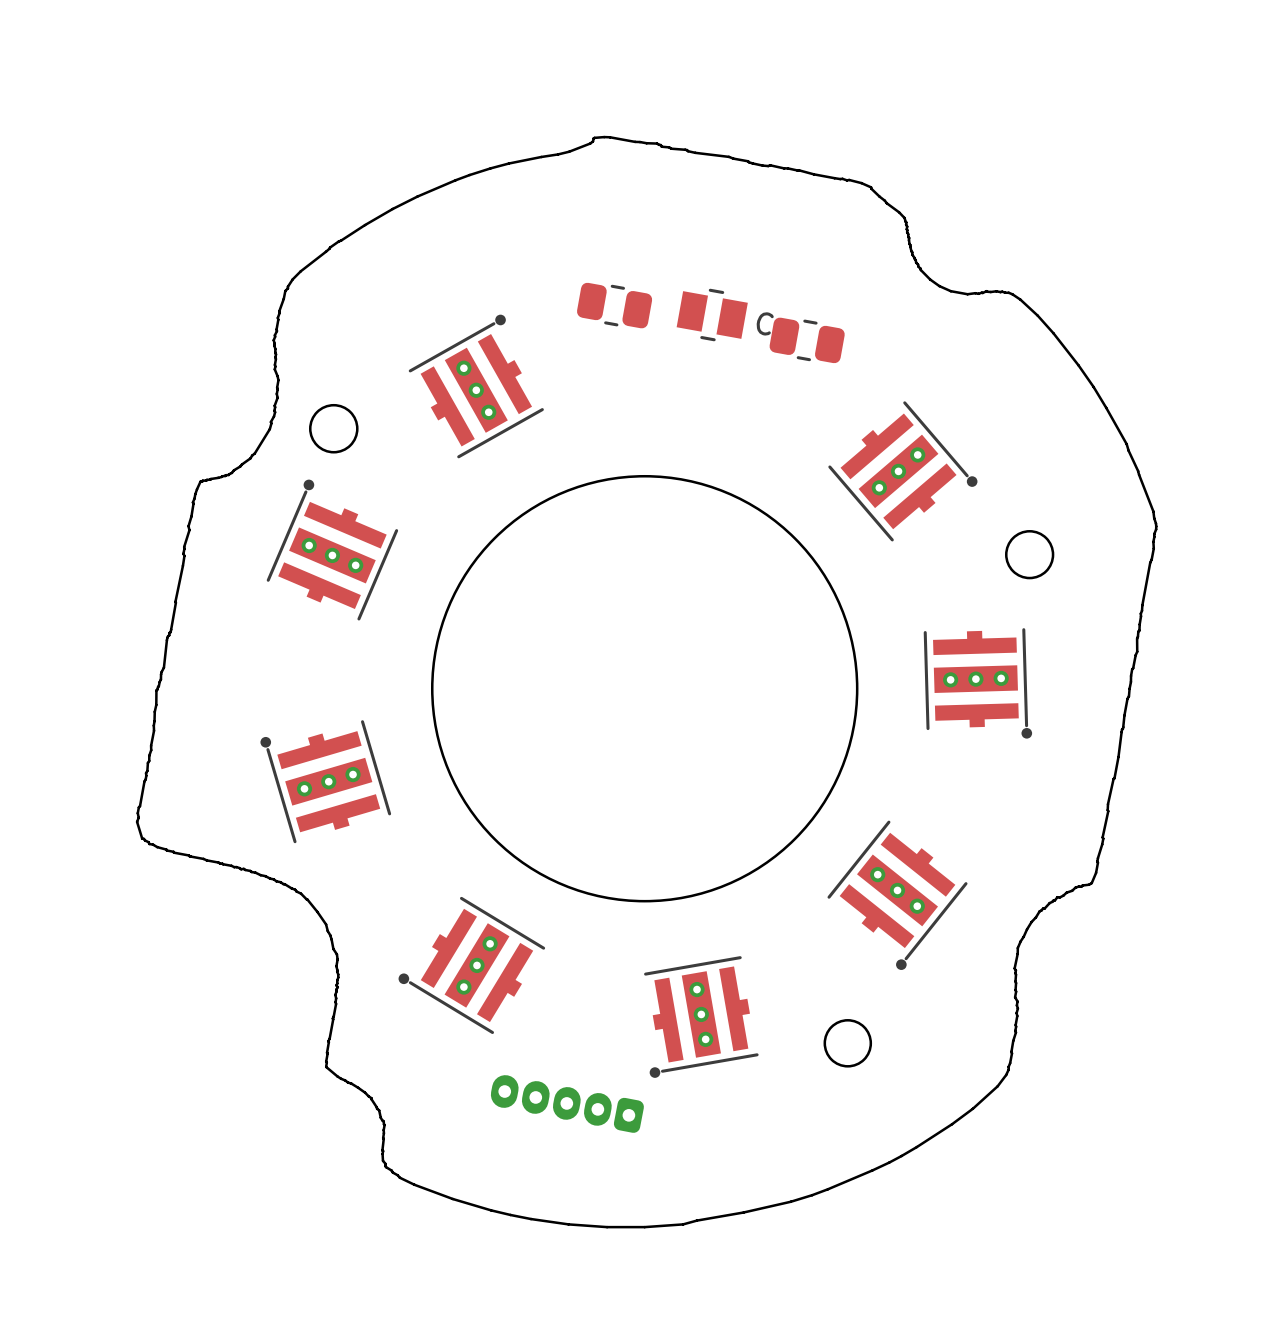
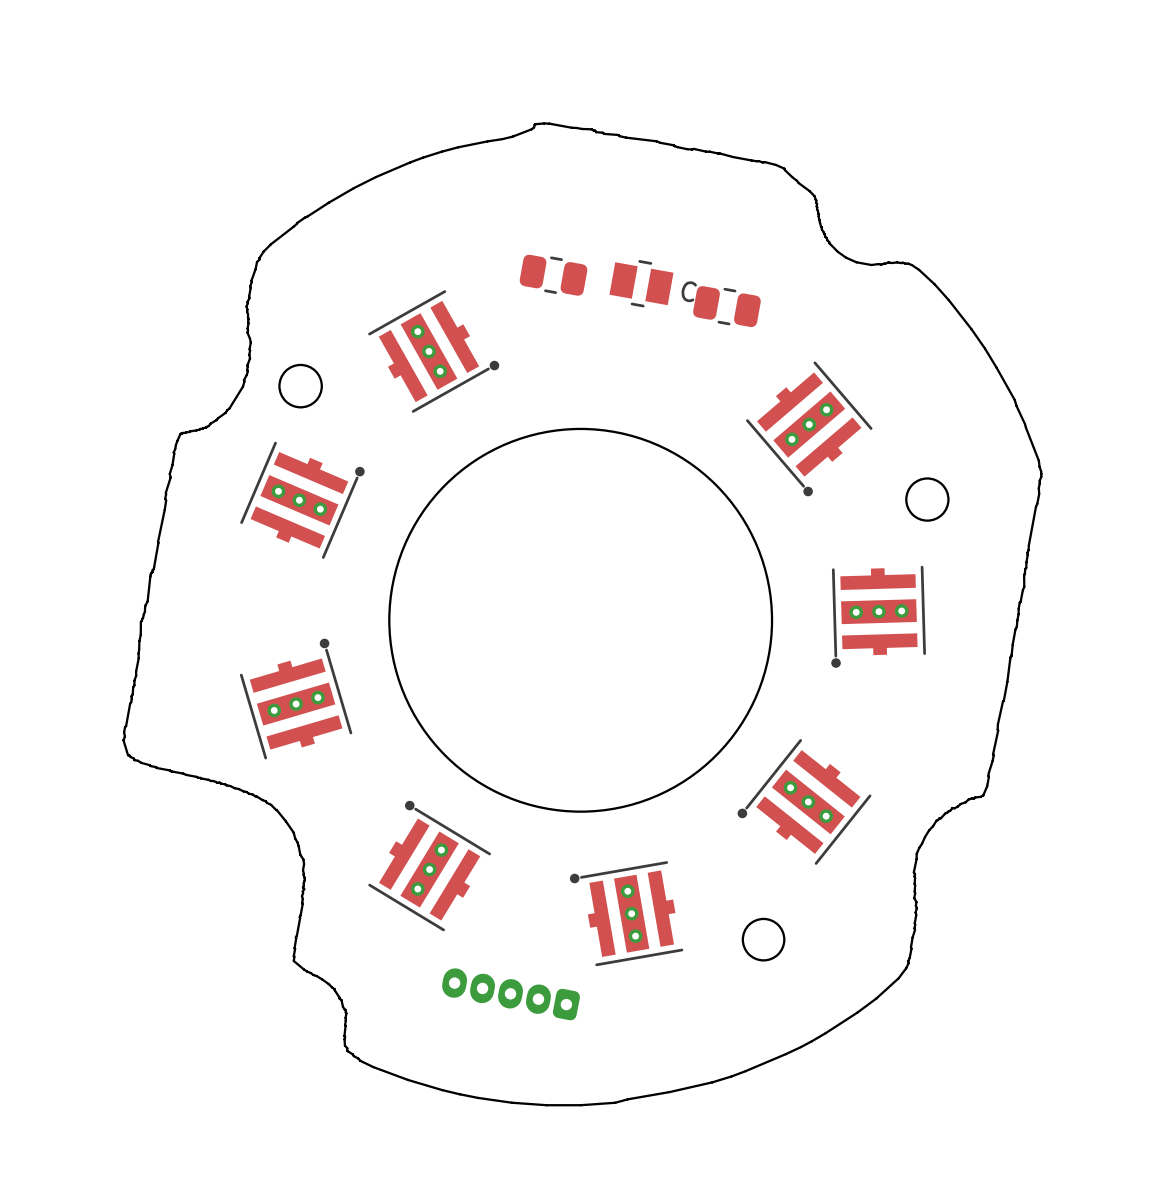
part footprint: [408, 314, 544, 459] -> [368, 290, 500, 413]
part footprint: [828, 401, 978, 542] -> [746, 361, 873, 497]
part footprint: [266, 479, 399, 621] -> [240, 441, 365, 559]
part footprint: [923, 628, 1033, 739] -> [831, 565, 926, 668]
part footprint: [260, 720, 392, 844] -> [239, 638, 353, 760]
part footprint: [827, 820, 968, 970] -> [737, 739, 872, 865]
part footprint: [398, 896, 546, 1035] -> [368, 800, 492, 932]
part footprint: [644, 956, 759, 1078] -> [569, 861, 684, 967]

